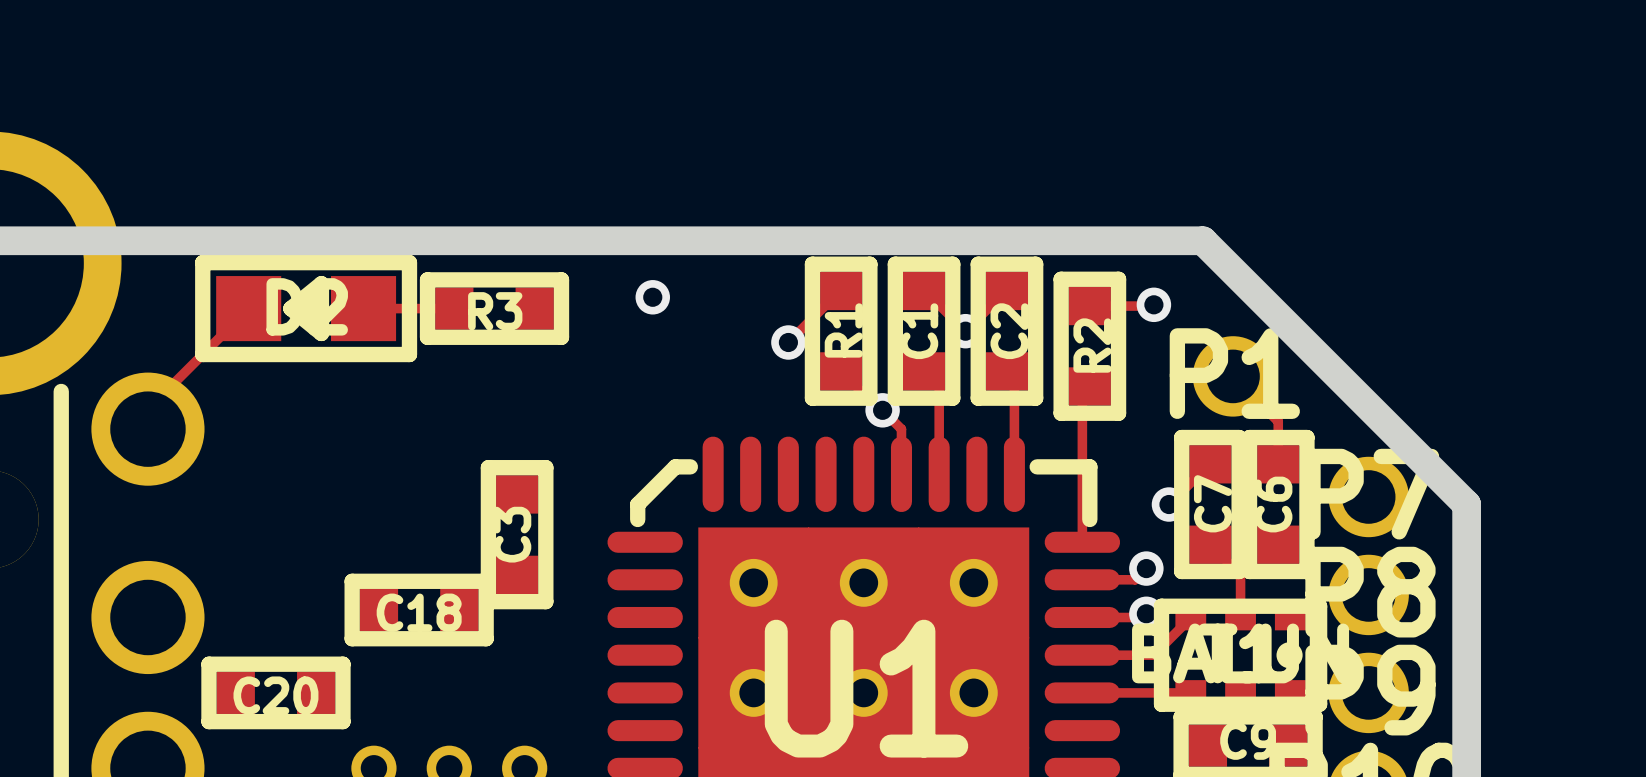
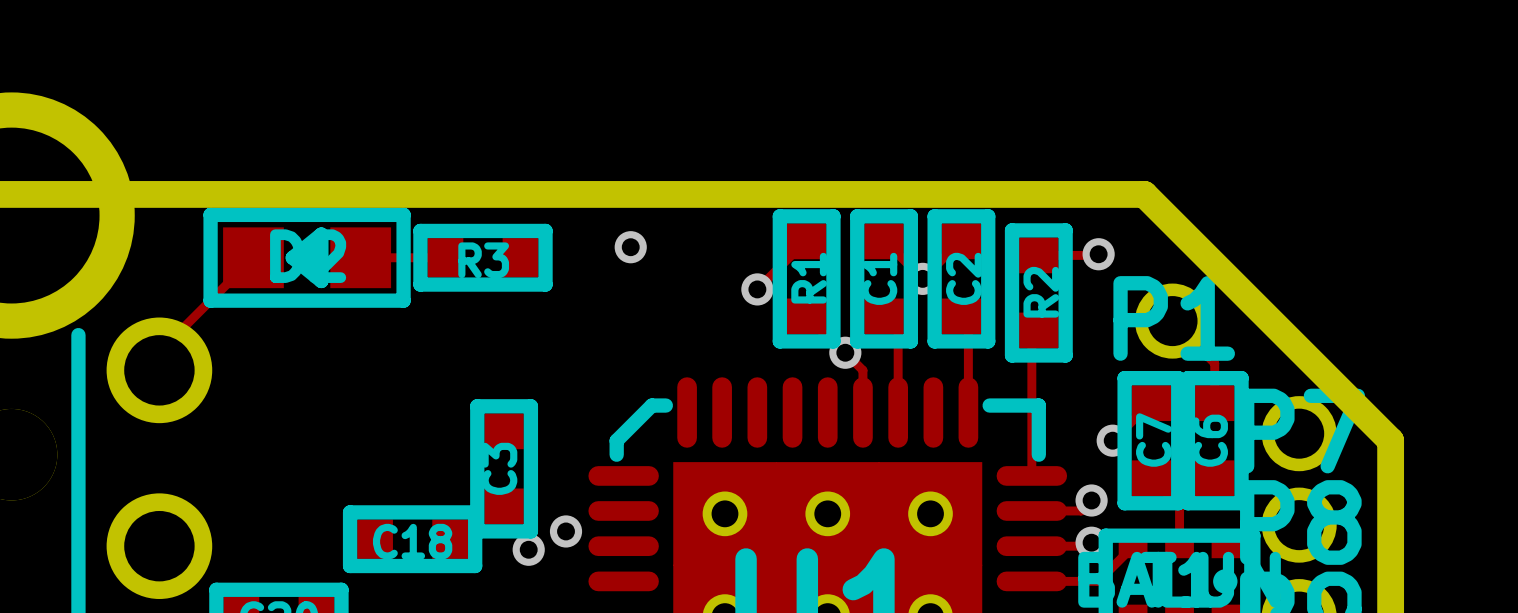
via: none -> (566, 531)
via: none -> (528, 549)

